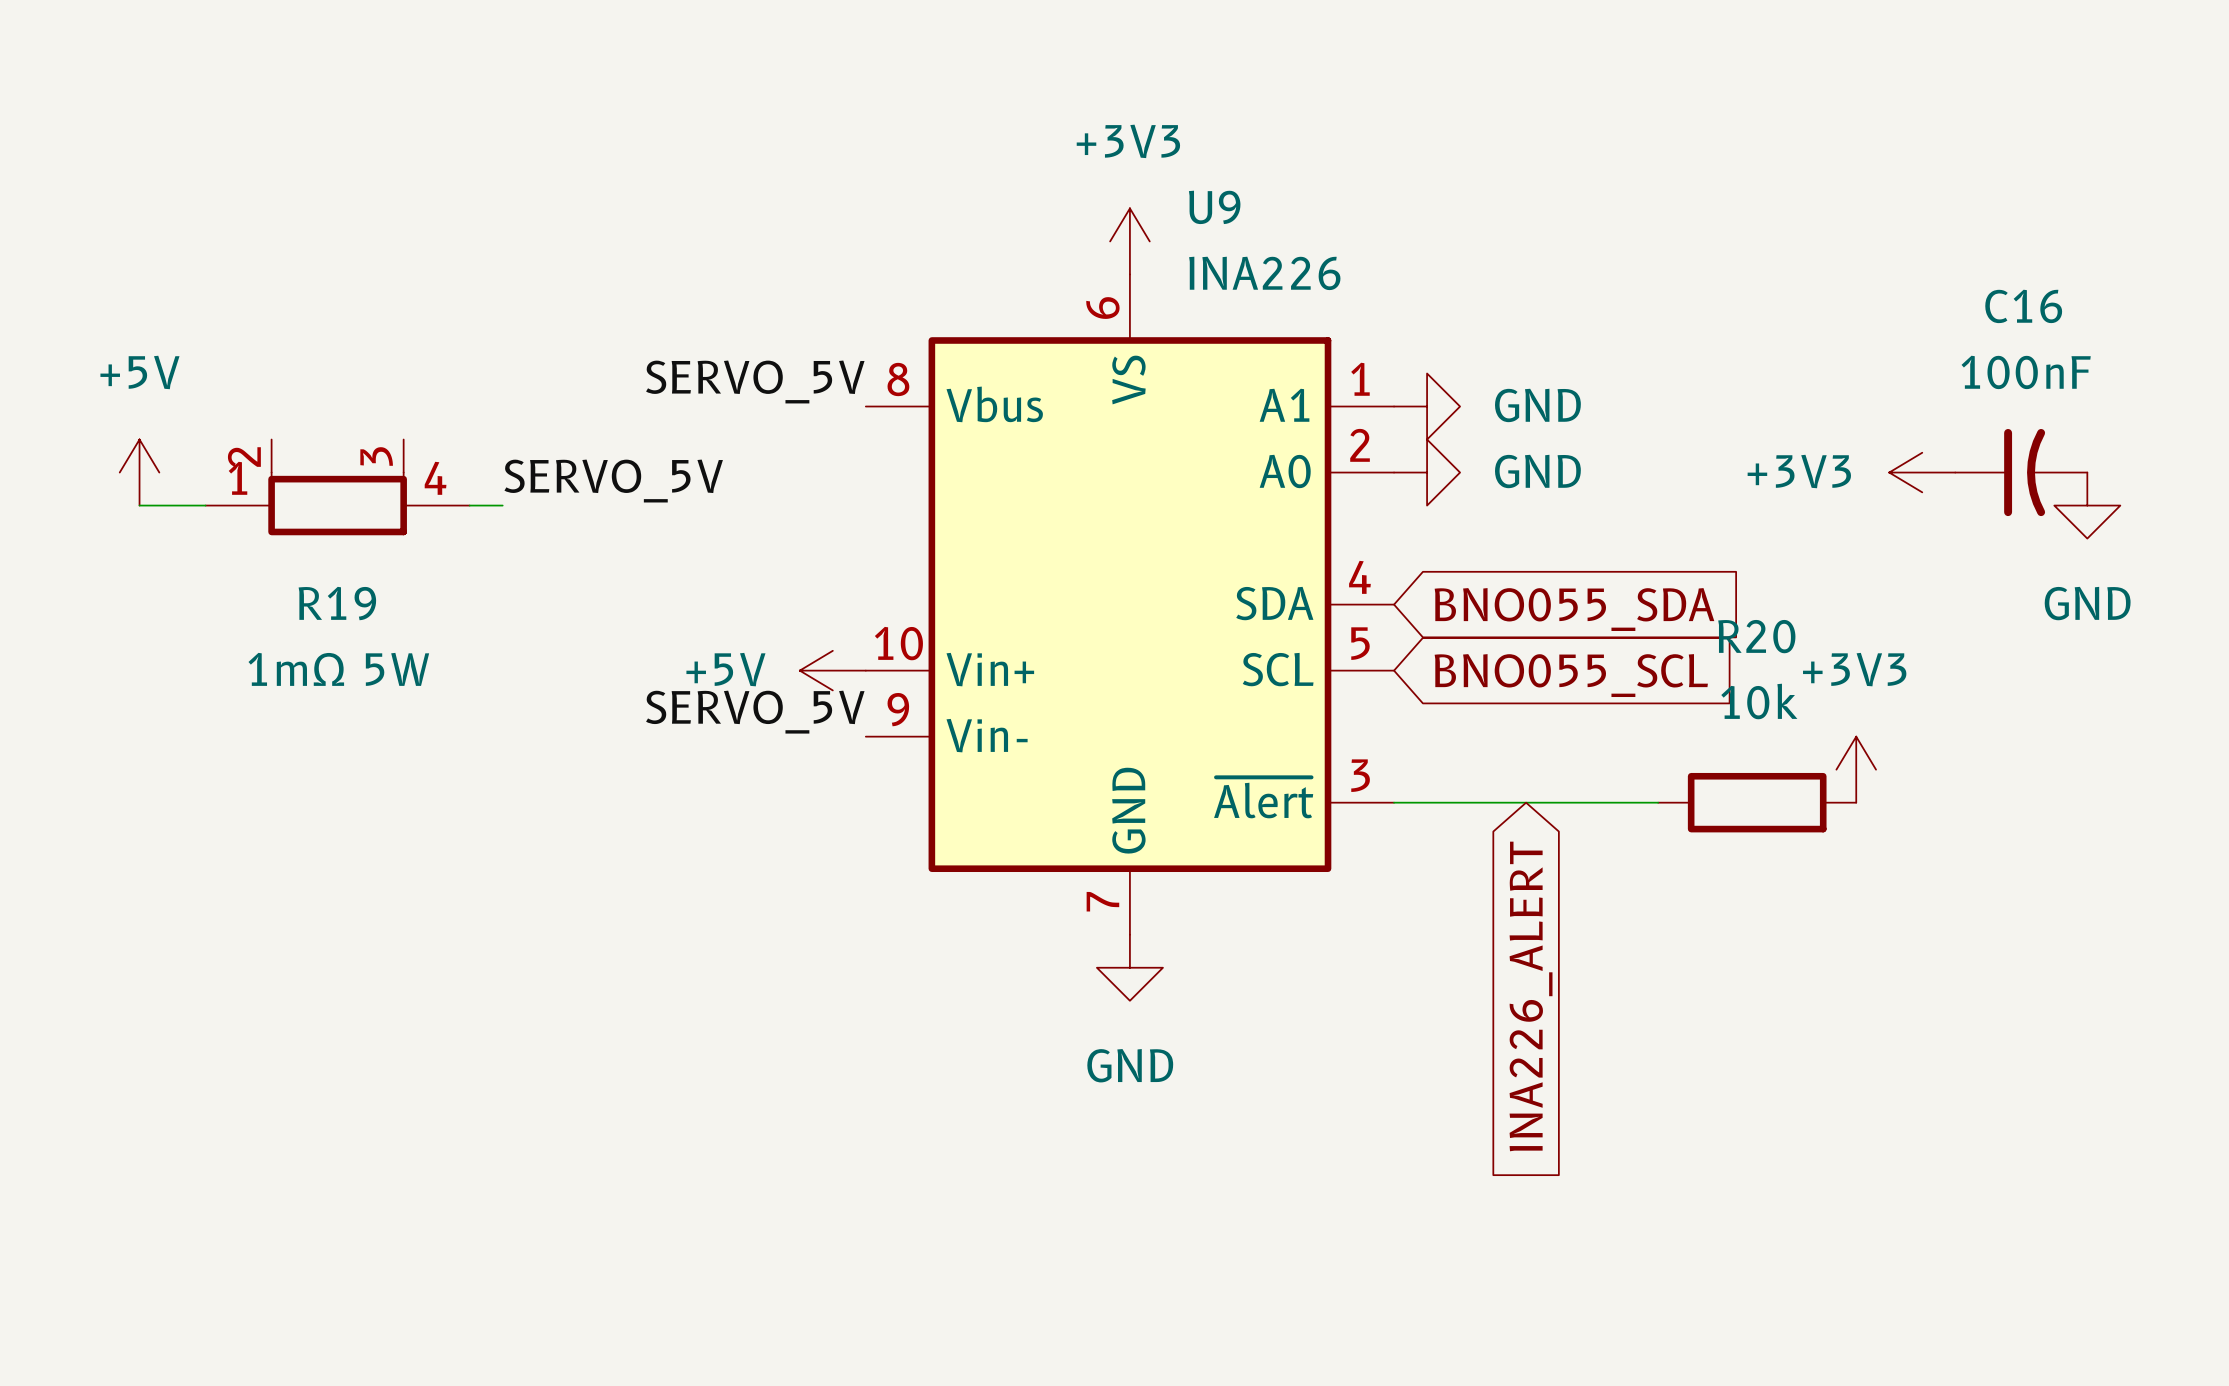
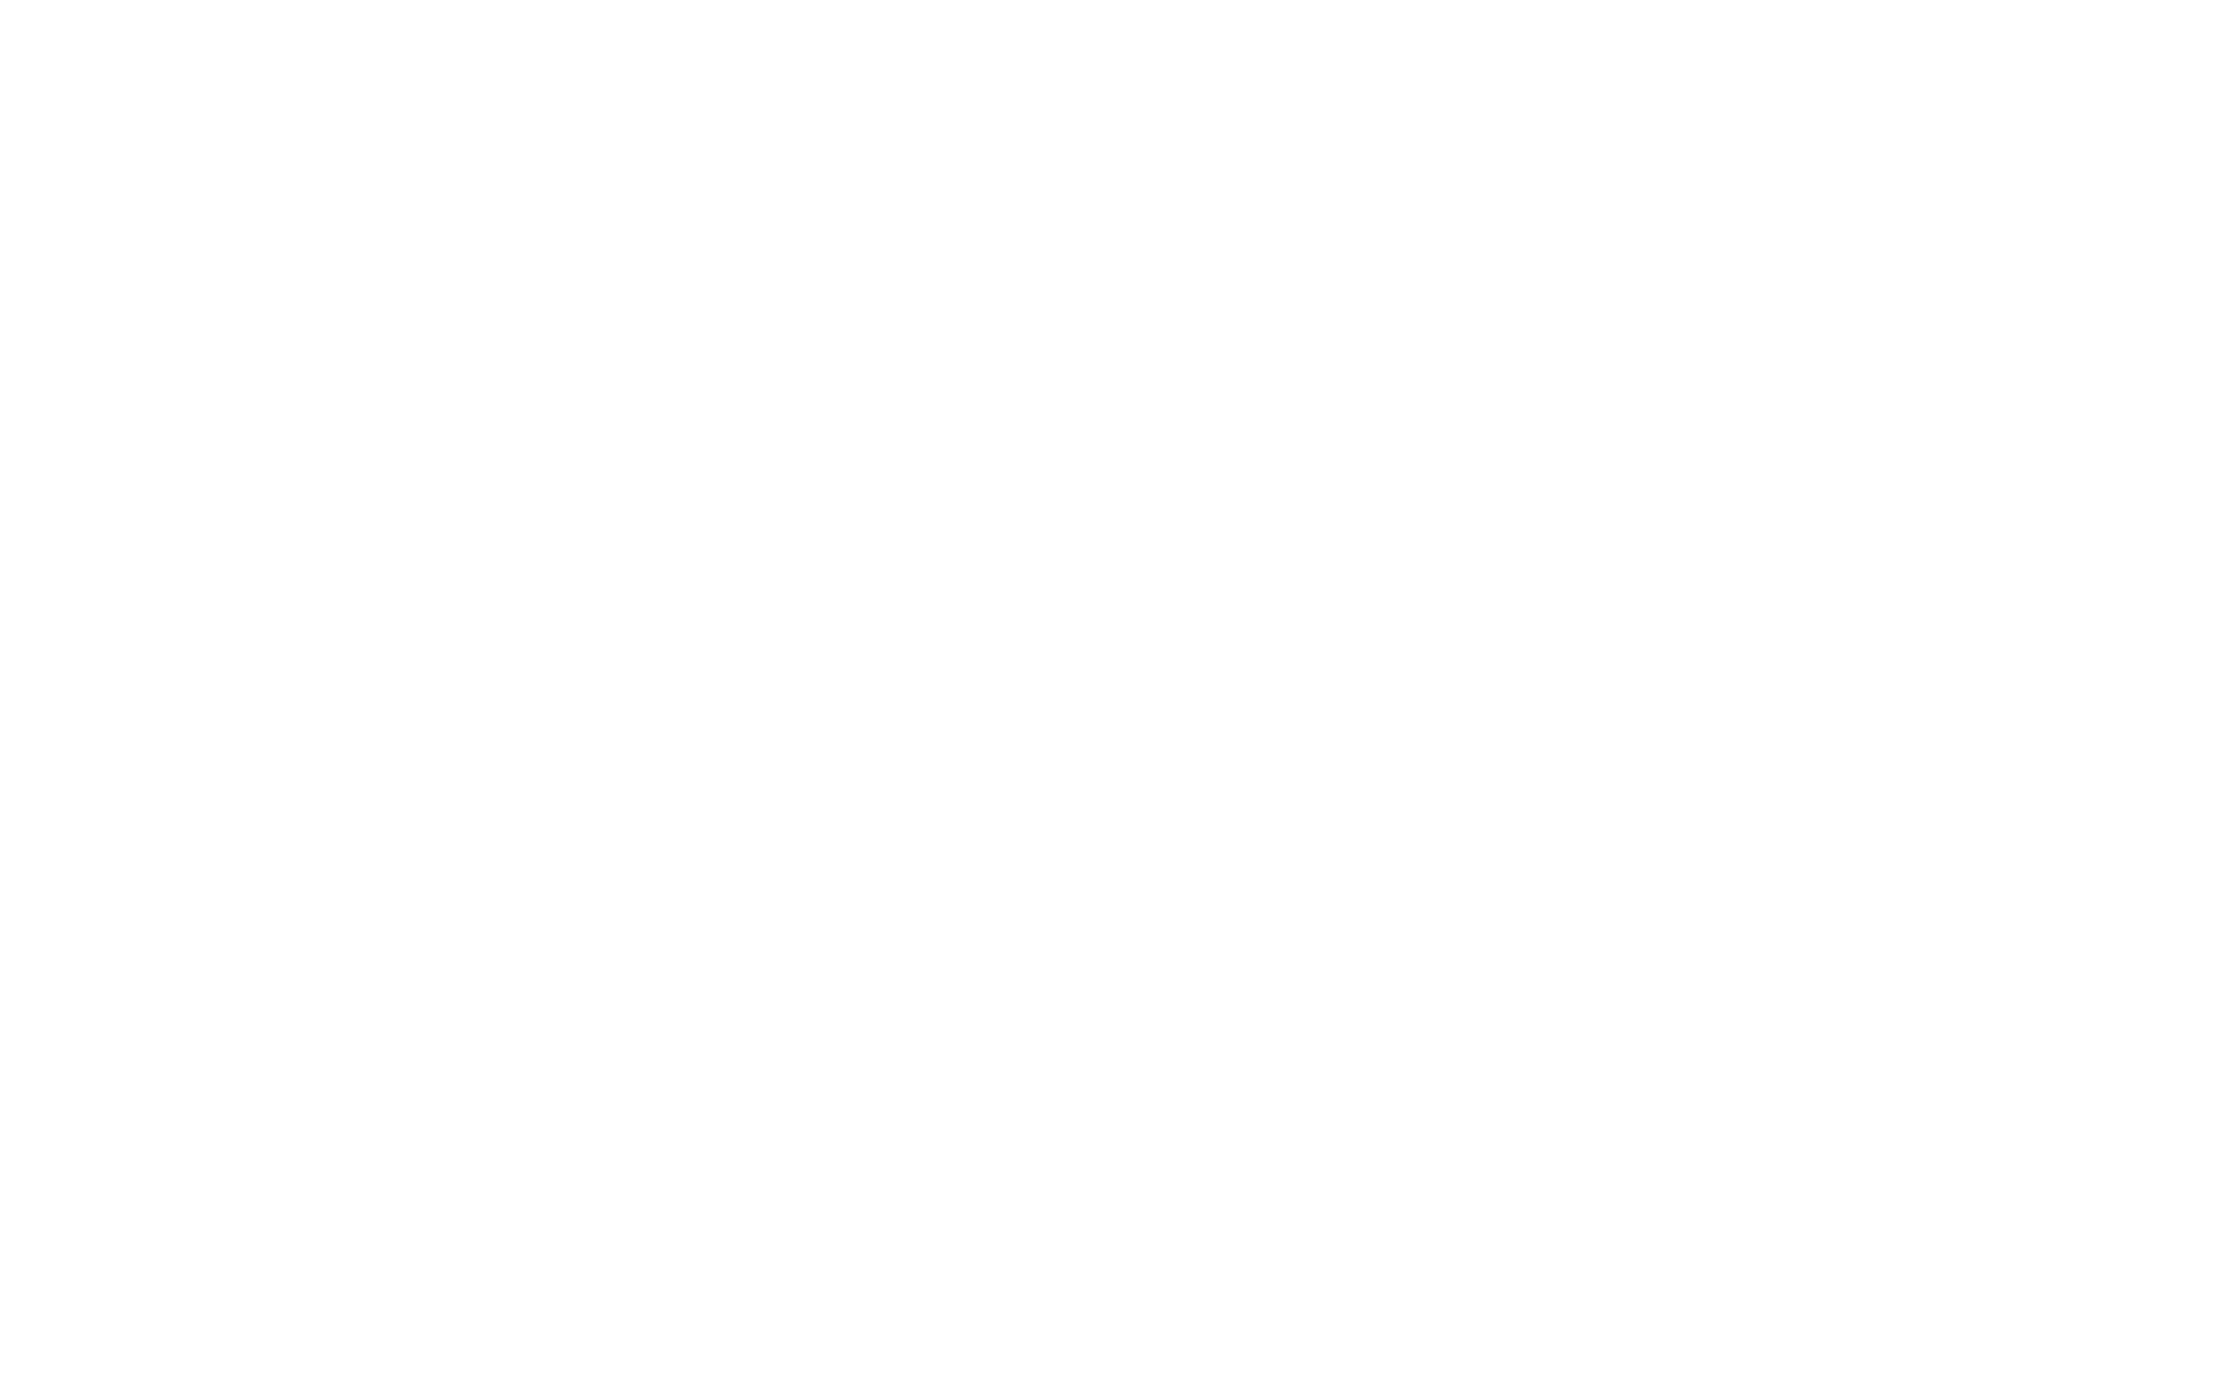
power symbol: +3V3 (1129, 241) -> none
label: SERVO_5V (755, 381) -> none
power symbol: GND (1427, 406) -> none
power symbol: +5V (139, 472) -> none
power symbol: GND (1427, 472) -> none
power symbol: +3V3 (1922, 472) -> none
C16: 100nF (2021, 472) -> none
label: SERVO_5V (613, 481) -> none
R19: 1mΩ 5W (337, 487) -> none
wire: (139, 505) (205, 505) -> none
wire: (469, 505) (502, 505) -> none
power symbol: GND (2087, 505) -> none
U9: INA226 (1129, 604) -> none
global label: BNO055_SDA (1574, 609) -> none
power symbol: +5V (832, 670) -> none
global label: BNO055_SCL (1571, 675) -> none
label: SERVO_5V (755, 712) -> none
power symbol: +3V3 (1856, 769) -> none
wire: (1394, 802) (1658, 802) -> none
R20: 10k (1757, 802) -> none
power symbol: GND (1129, 967) -> none
global label: INA226_ALERT (1531, 996) -> none

